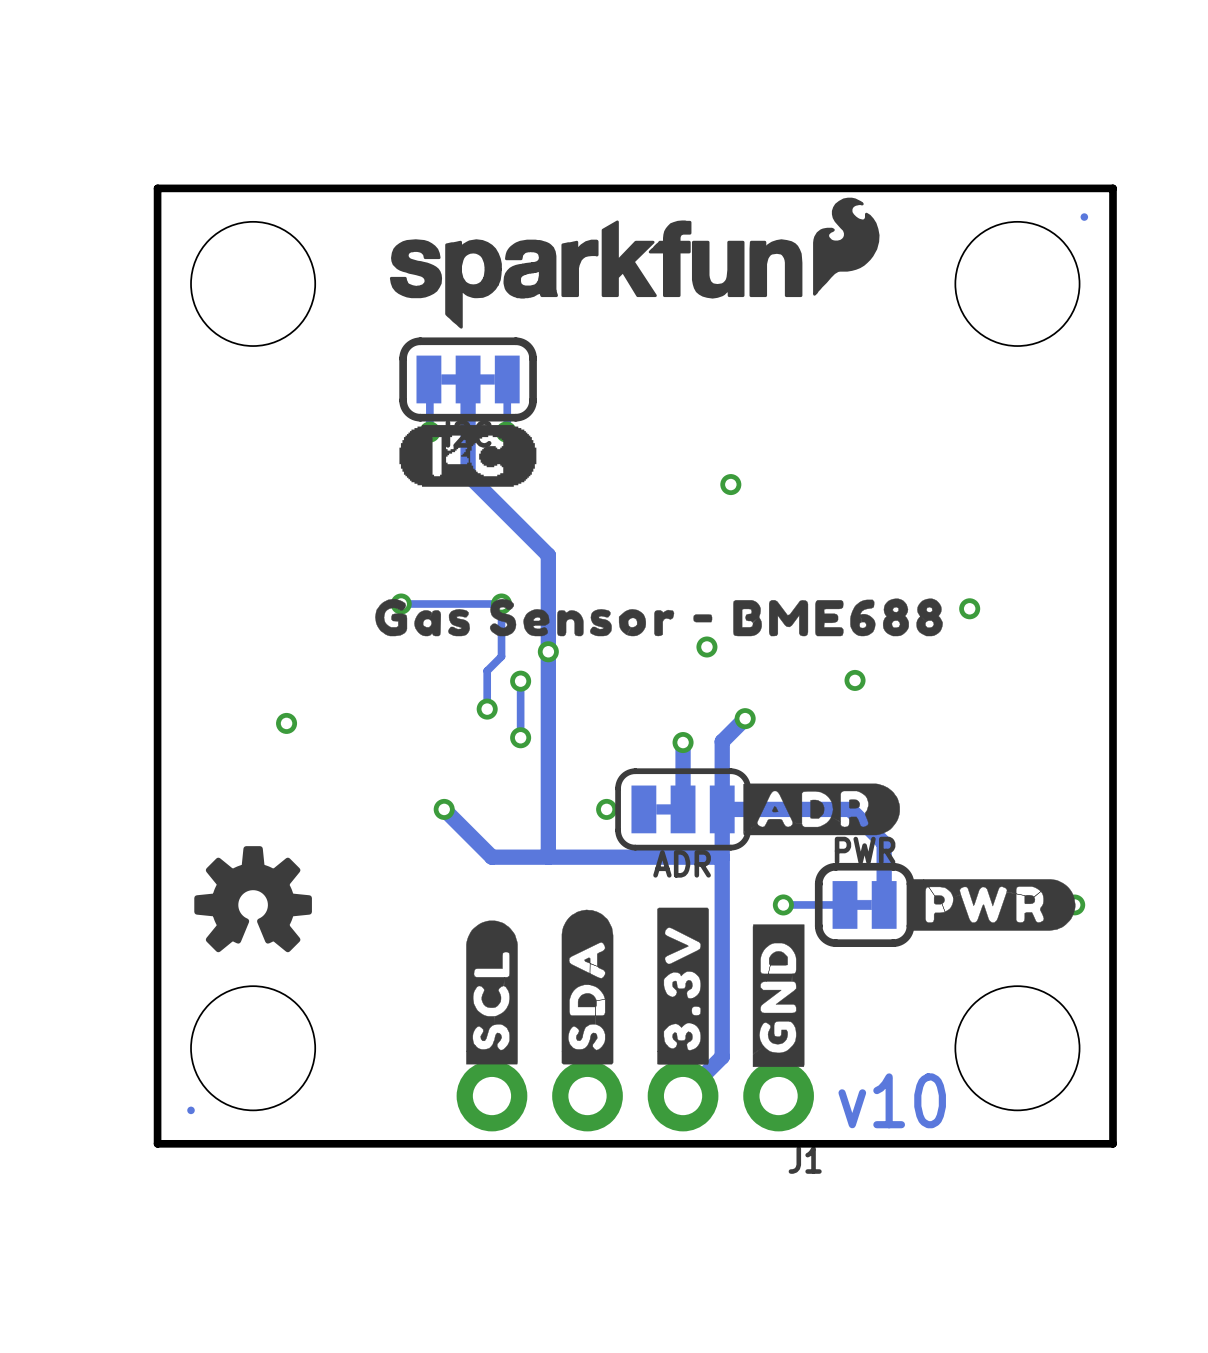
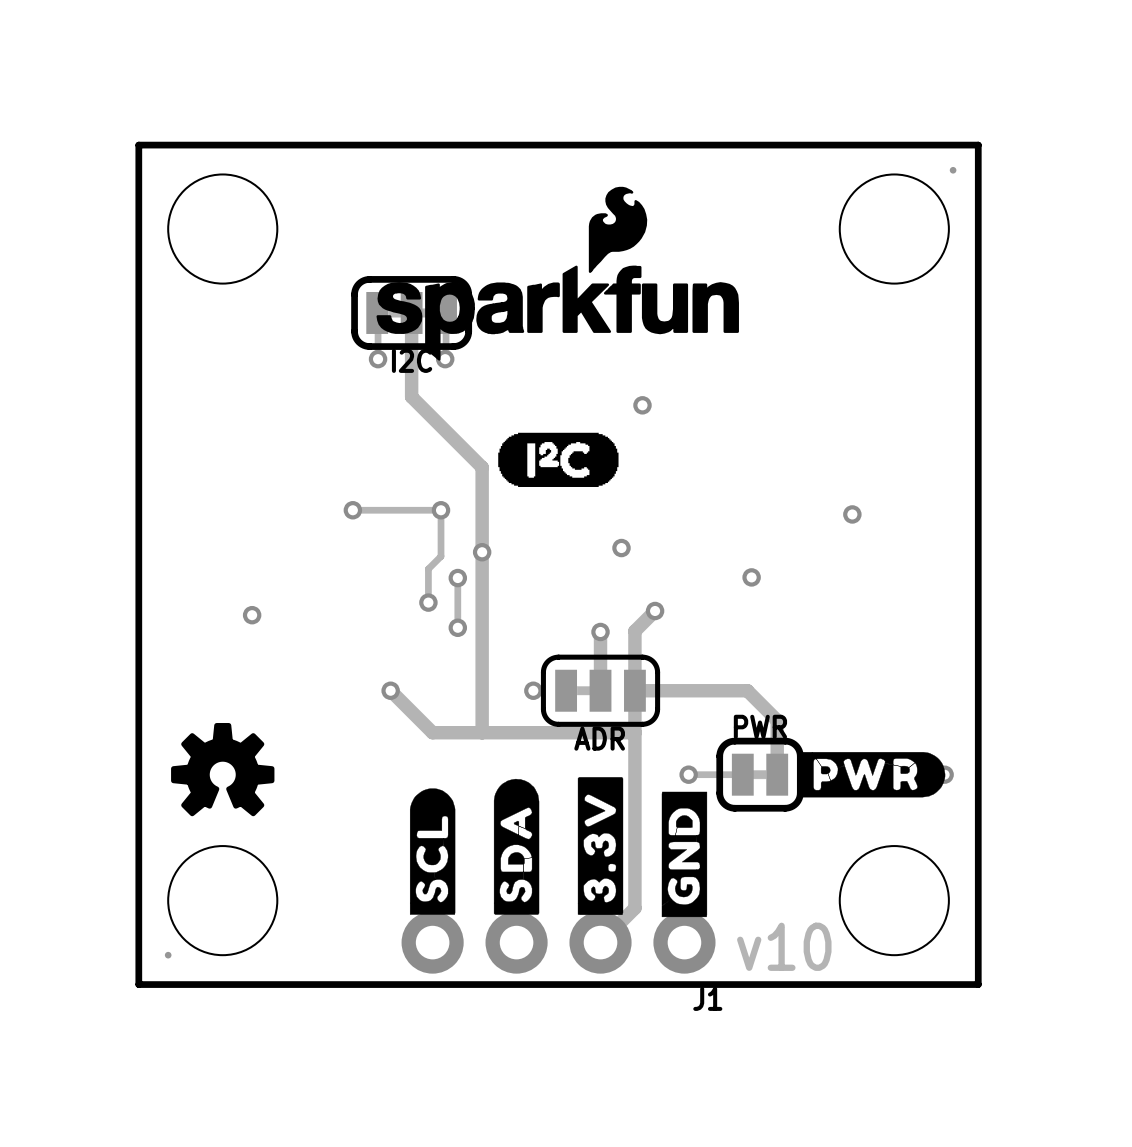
drawing position: (846, 246) -> (618, 229)
drawing position: (596, 274) -> (557, 313)
drawing position: (467, 455) -> (558, 459)
drawing: [375, 598, 943, 637] -> none
drawing: [743, 783, 900, 836] -> none

